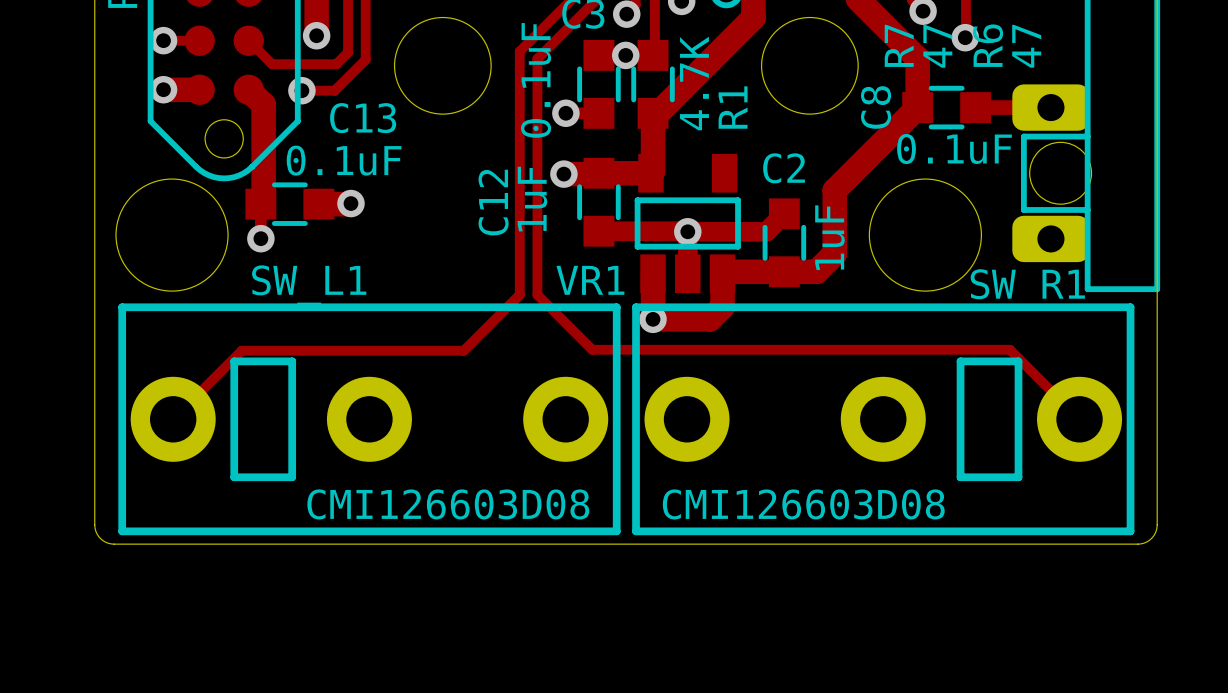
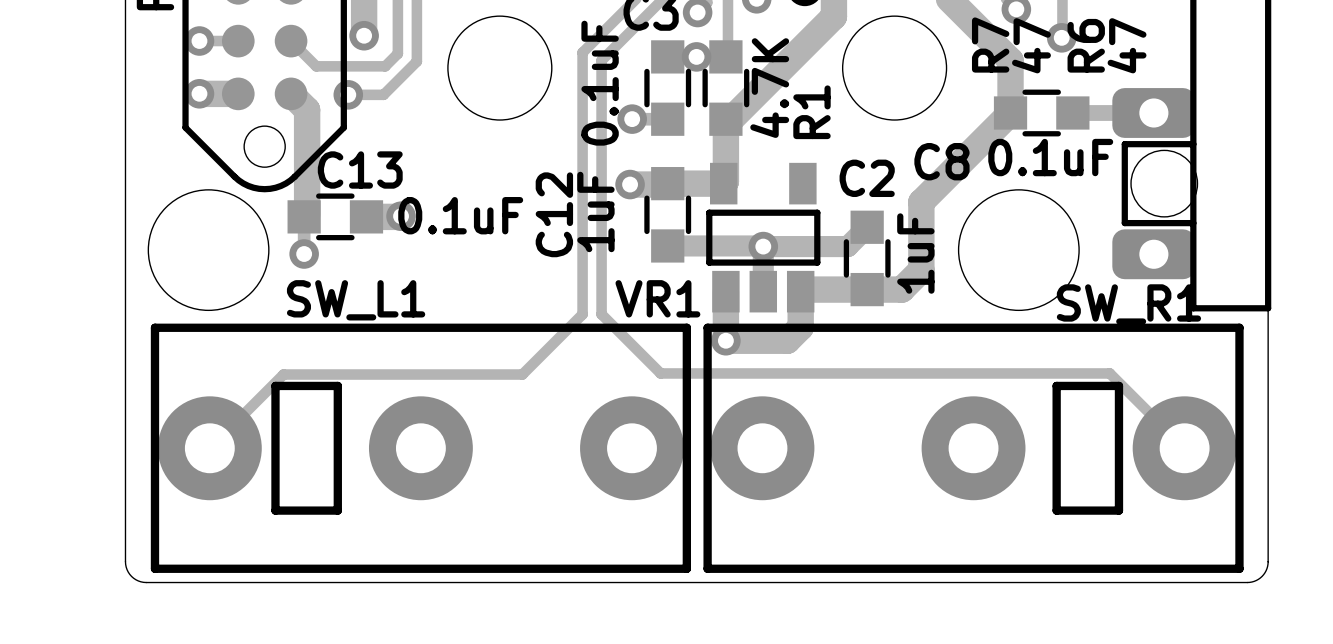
C8 name rotation: 0° (876, 107) -> 90° clockwise (941, 161)
C13 name position: C13 (363, 118) -> C13 (360, 170)
C13 value position: 0.1uF (344, 160) -> 0.1uF (460, 215)
SW_L1 footprint: [118, 303, 621, 536] -> [150, 323, 691, 573]
SW_R1 footprint: [632, 303, 1135, 536] -> [703, 323, 1244, 573]
SW_L1 value: CMI126603D08 (448, 504) -> none
SW_R1 value: CMI126603D08 (803, 504) -> none

